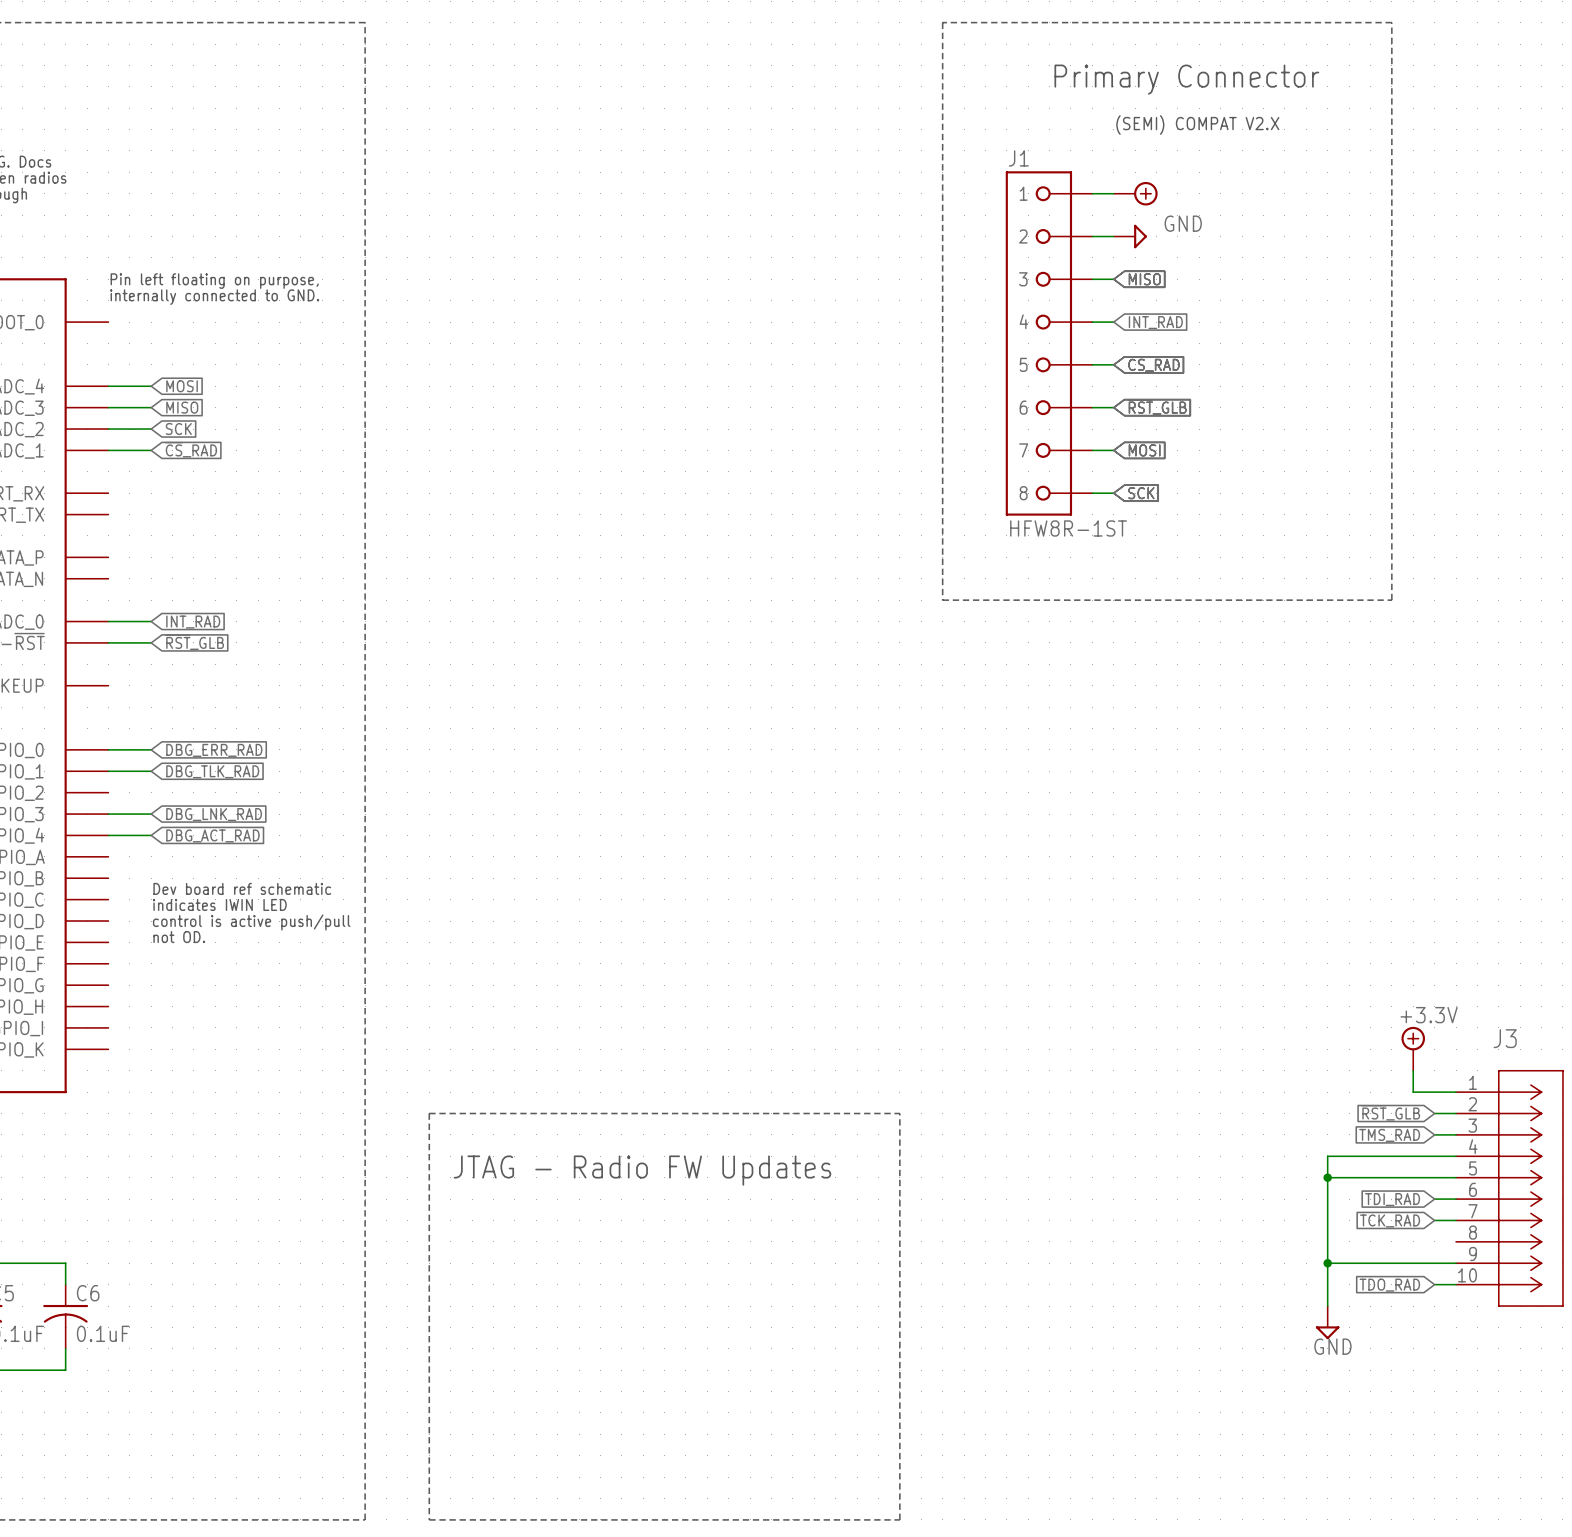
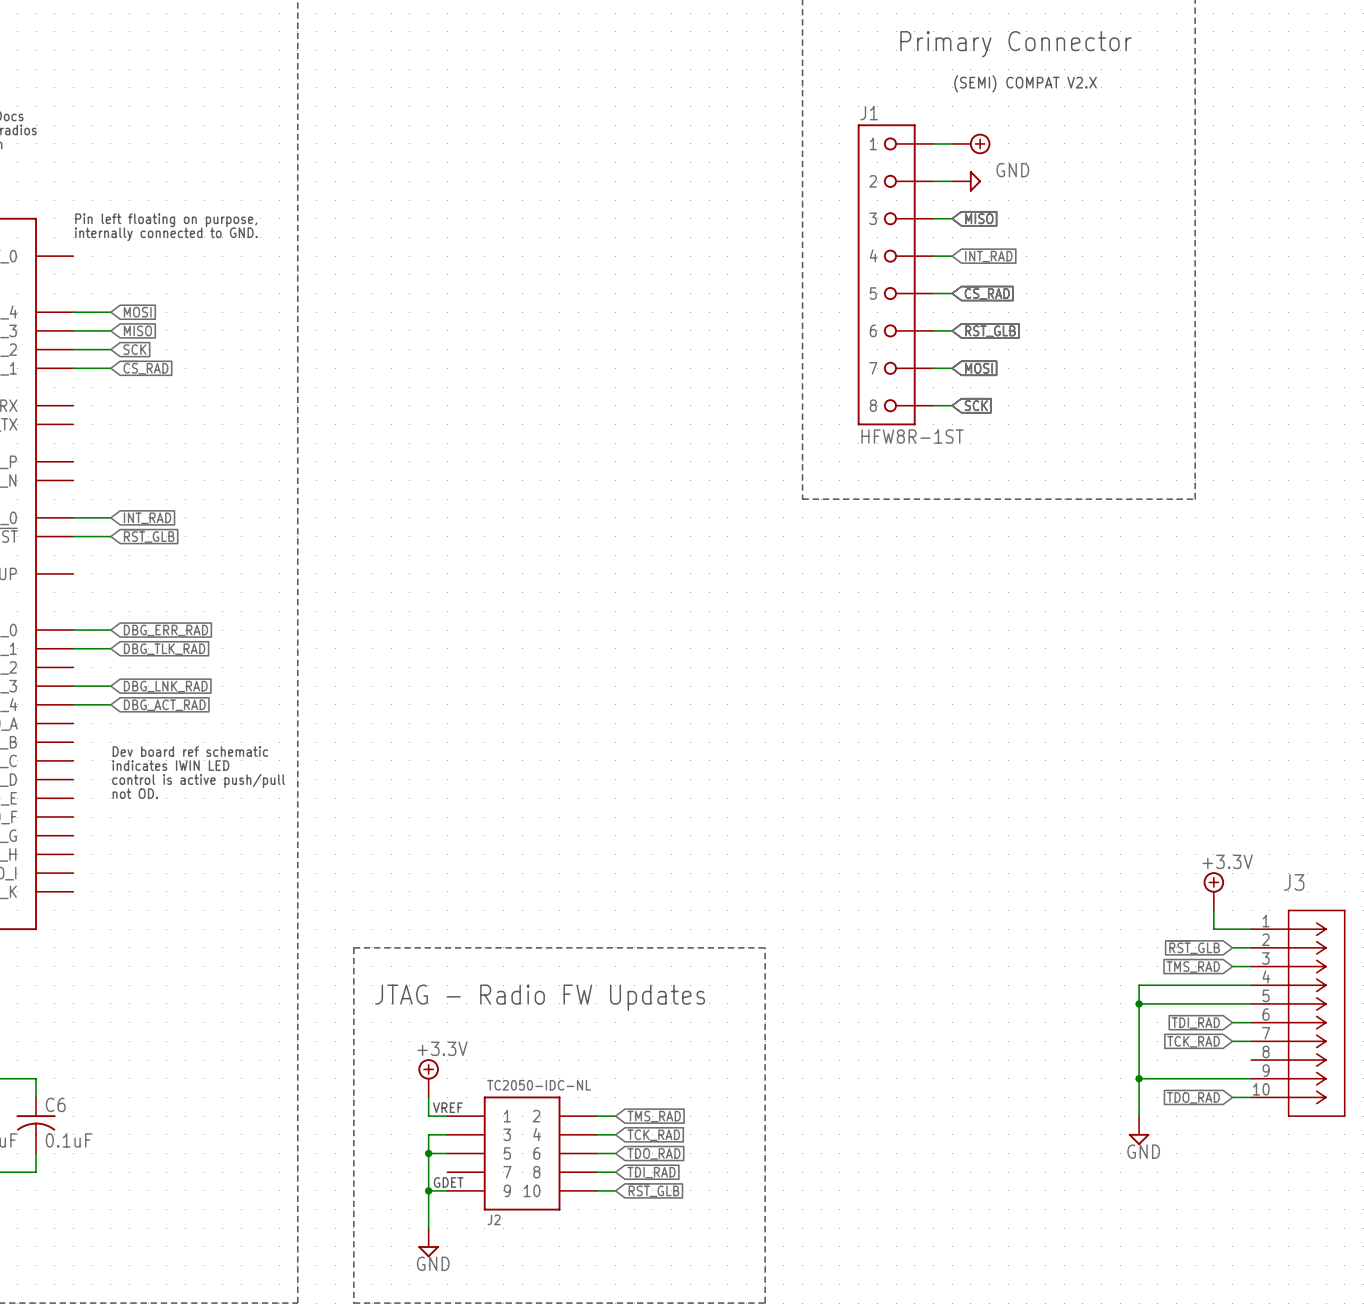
power symbol: none -> +3.3V (428, 1078)
wire: none -> (428, 1097) (428, 1116) (447, 1116)
text: none -> VREF (447, 1107)
wire: none -> (596, 1116) (615, 1116)
global label: none -> TMS_RAD (654, 1116)
wire: none -> (447, 1134) (428, 1134) (428, 1228)
wire: none -> (596, 1134) (615, 1134)
global label: none -> TCK_RAD (653, 1135)
wire: none -> (428, 1153) (447, 1153)
junction: none -> (428, 1153)
J2: none -> TC2050-IDC-NL (522, 1153)
wire: none -> (596, 1153) (615, 1153)
global label: none -> TDO_RAD (653, 1153)
wire: none -> (596, 1172) (615, 1172)
global label: none -> TDI_RAD (651, 1172)
text: none -> GDET (448, 1182)
global label: none -> ~{RST}_GLB (653, 1190)
wire: none -> (428, 1190) (447, 1190)
junction: none -> (428, 1190)
wire: none -> (596, 1190) (615, 1190)
power symbol: none -> GND (428, 1242)

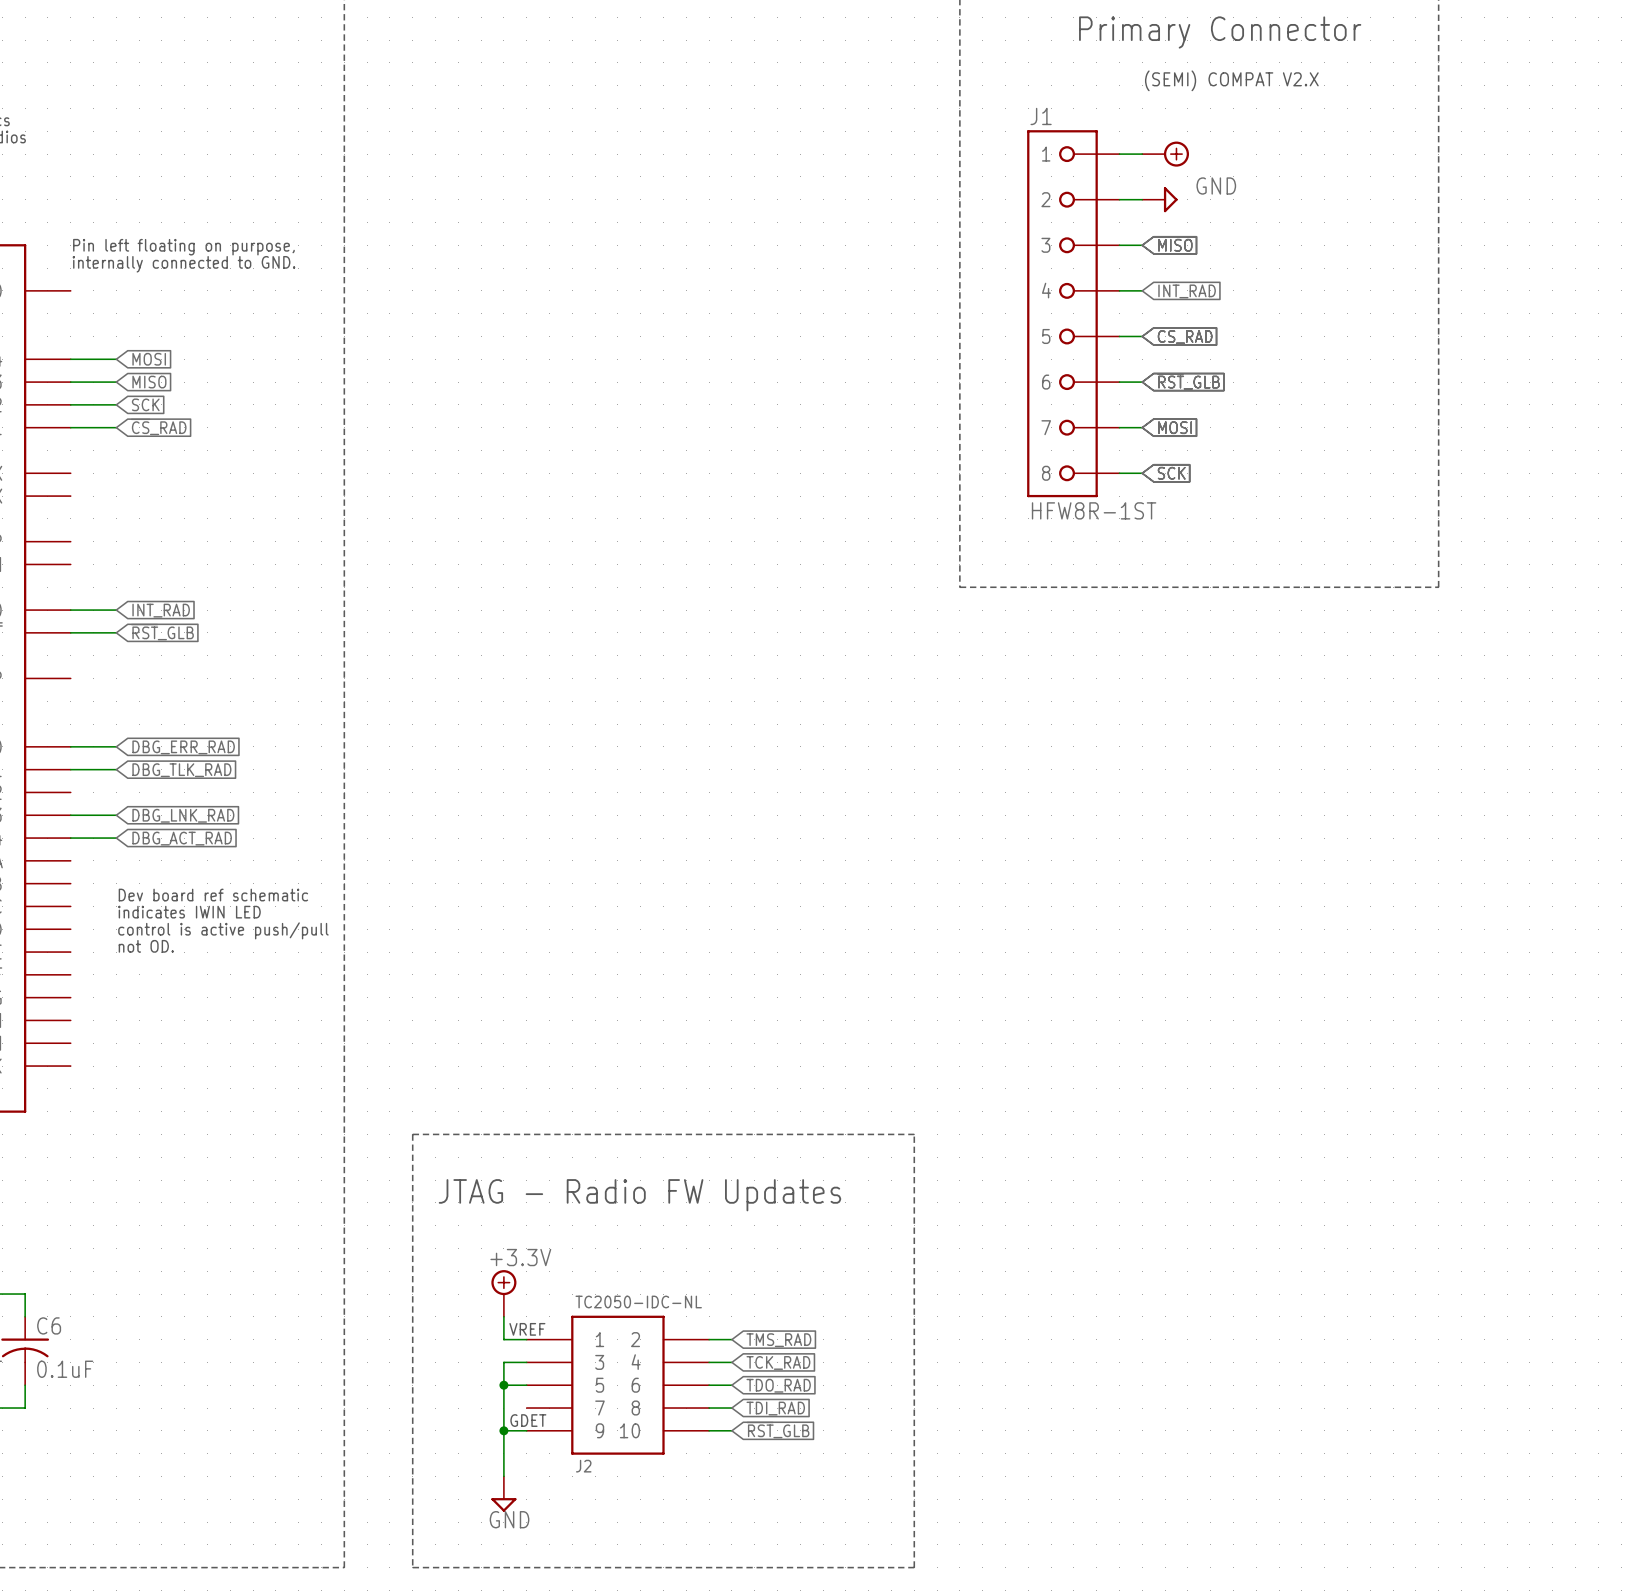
power symbol: +3.3V (1213, 891) -> none
wire: (1213, 910) (1213, 929) (1251, 929) -> none
global label: ~{RST}_GLB (1194, 947) -> none
wire: (1232, 947) (1251, 947) -> none
wire: (1232, 966) (1251, 966) -> none
global label: TMS_RAD (1193, 967) -> none
wire: (1251, 985) (1139, 985) (1139, 1116) -> none
wire: (1139, 1003) (1251, 1003) -> none
junction: (1139, 1003) -> none
J3: (1298, 1013) -> none
wire: (1232, 1022) (1251, 1022) -> none
global label: TDI_RAD (1195, 1023) -> none
global label: TCK_RAD (1193, 1041) -> none
wire: (1232, 1041) (1251, 1041) -> none
wire: (1139, 1078) (1251, 1078) -> none
junction: (1139, 1078) -> none
global label: TDO_RAD (1193, 1097) -> none
wire: (1232, 1097) (1251, 1097) -> none
power symbol: GND (1139, 1130) -> none

